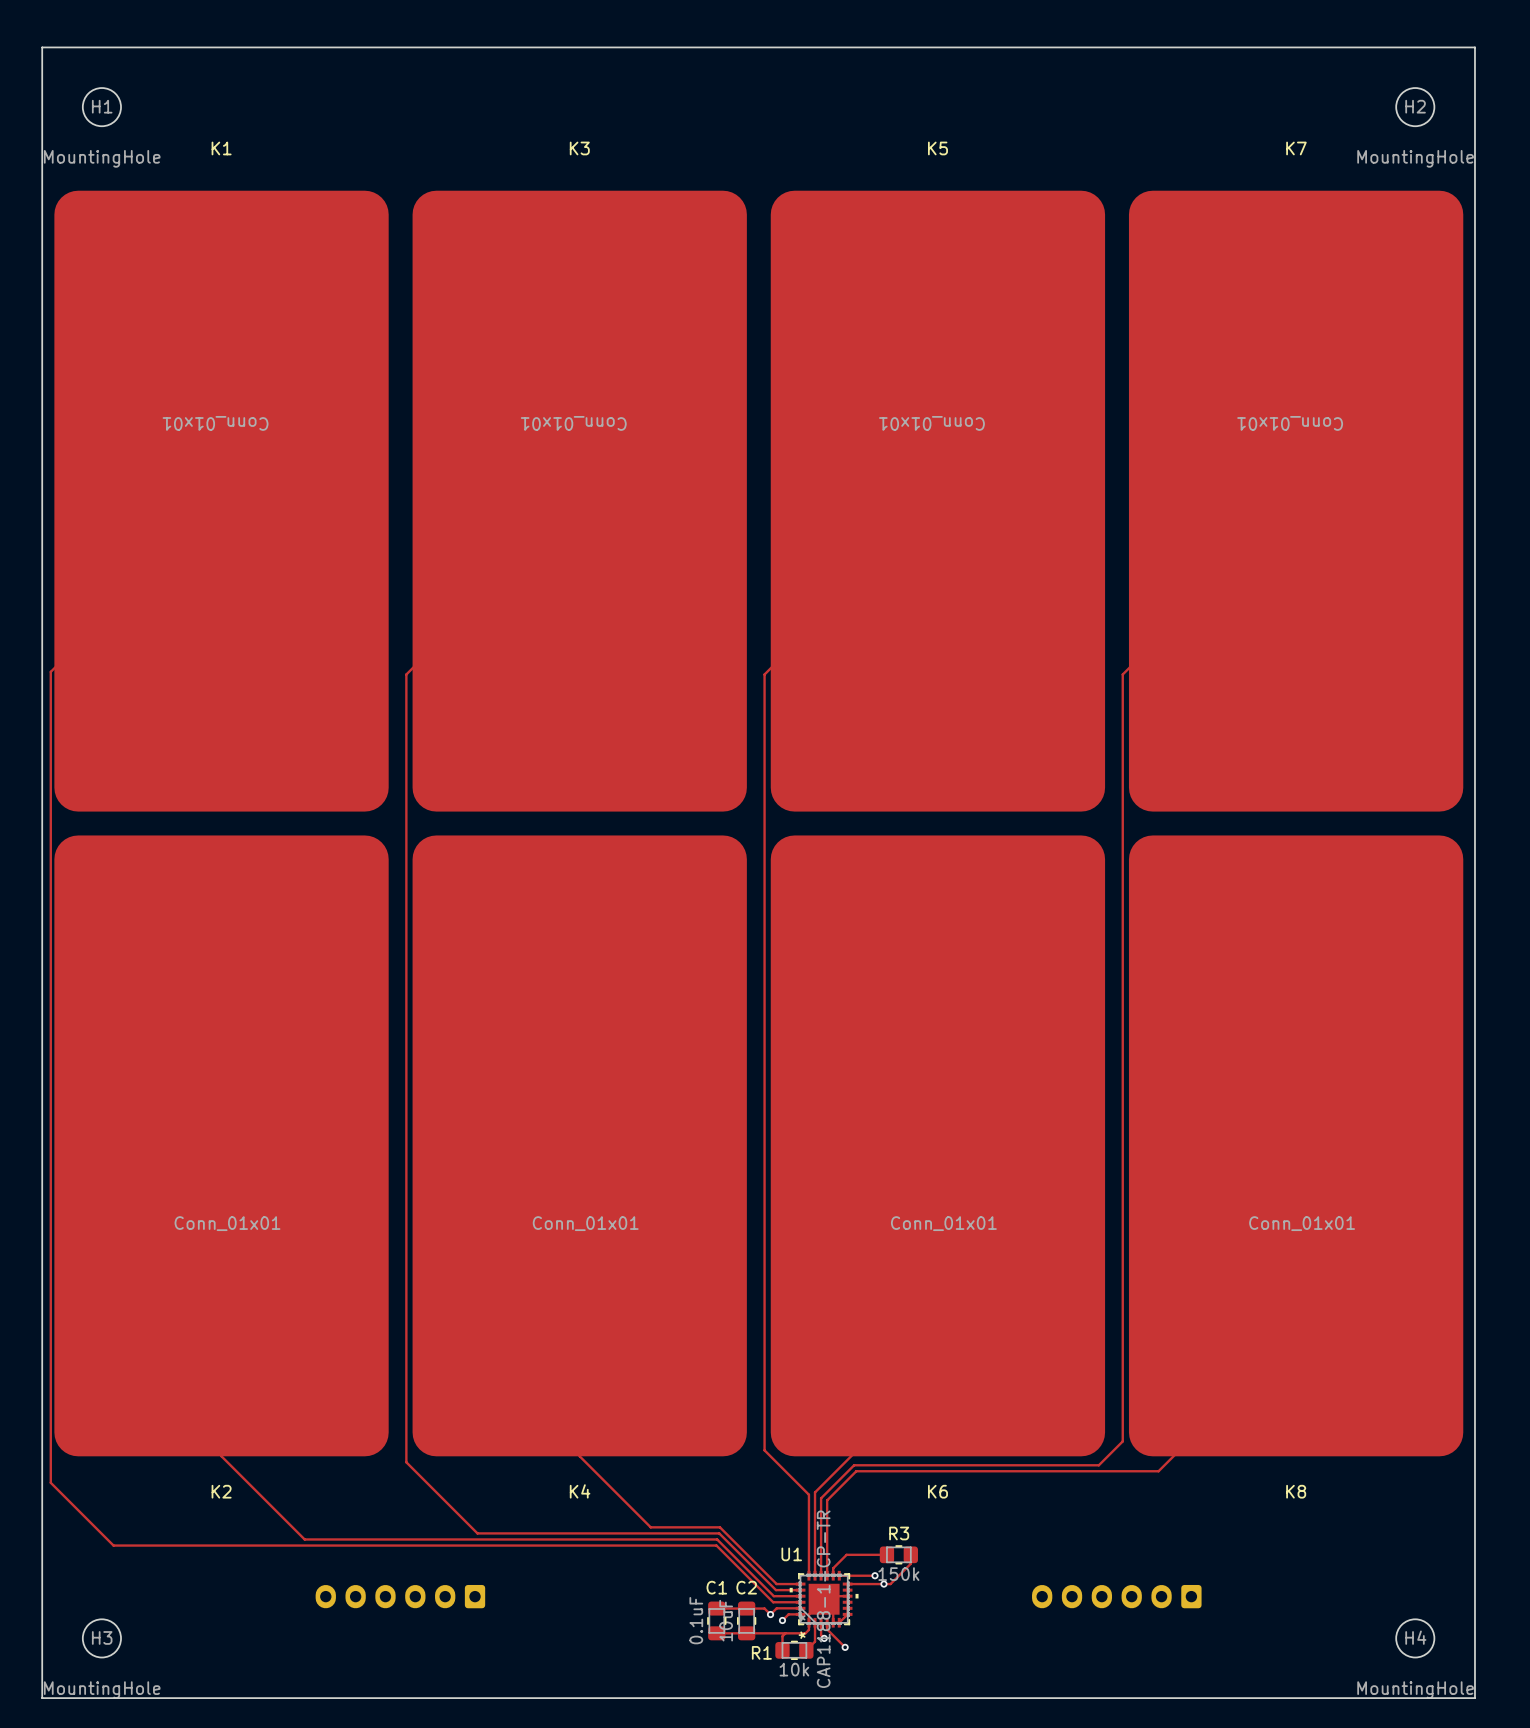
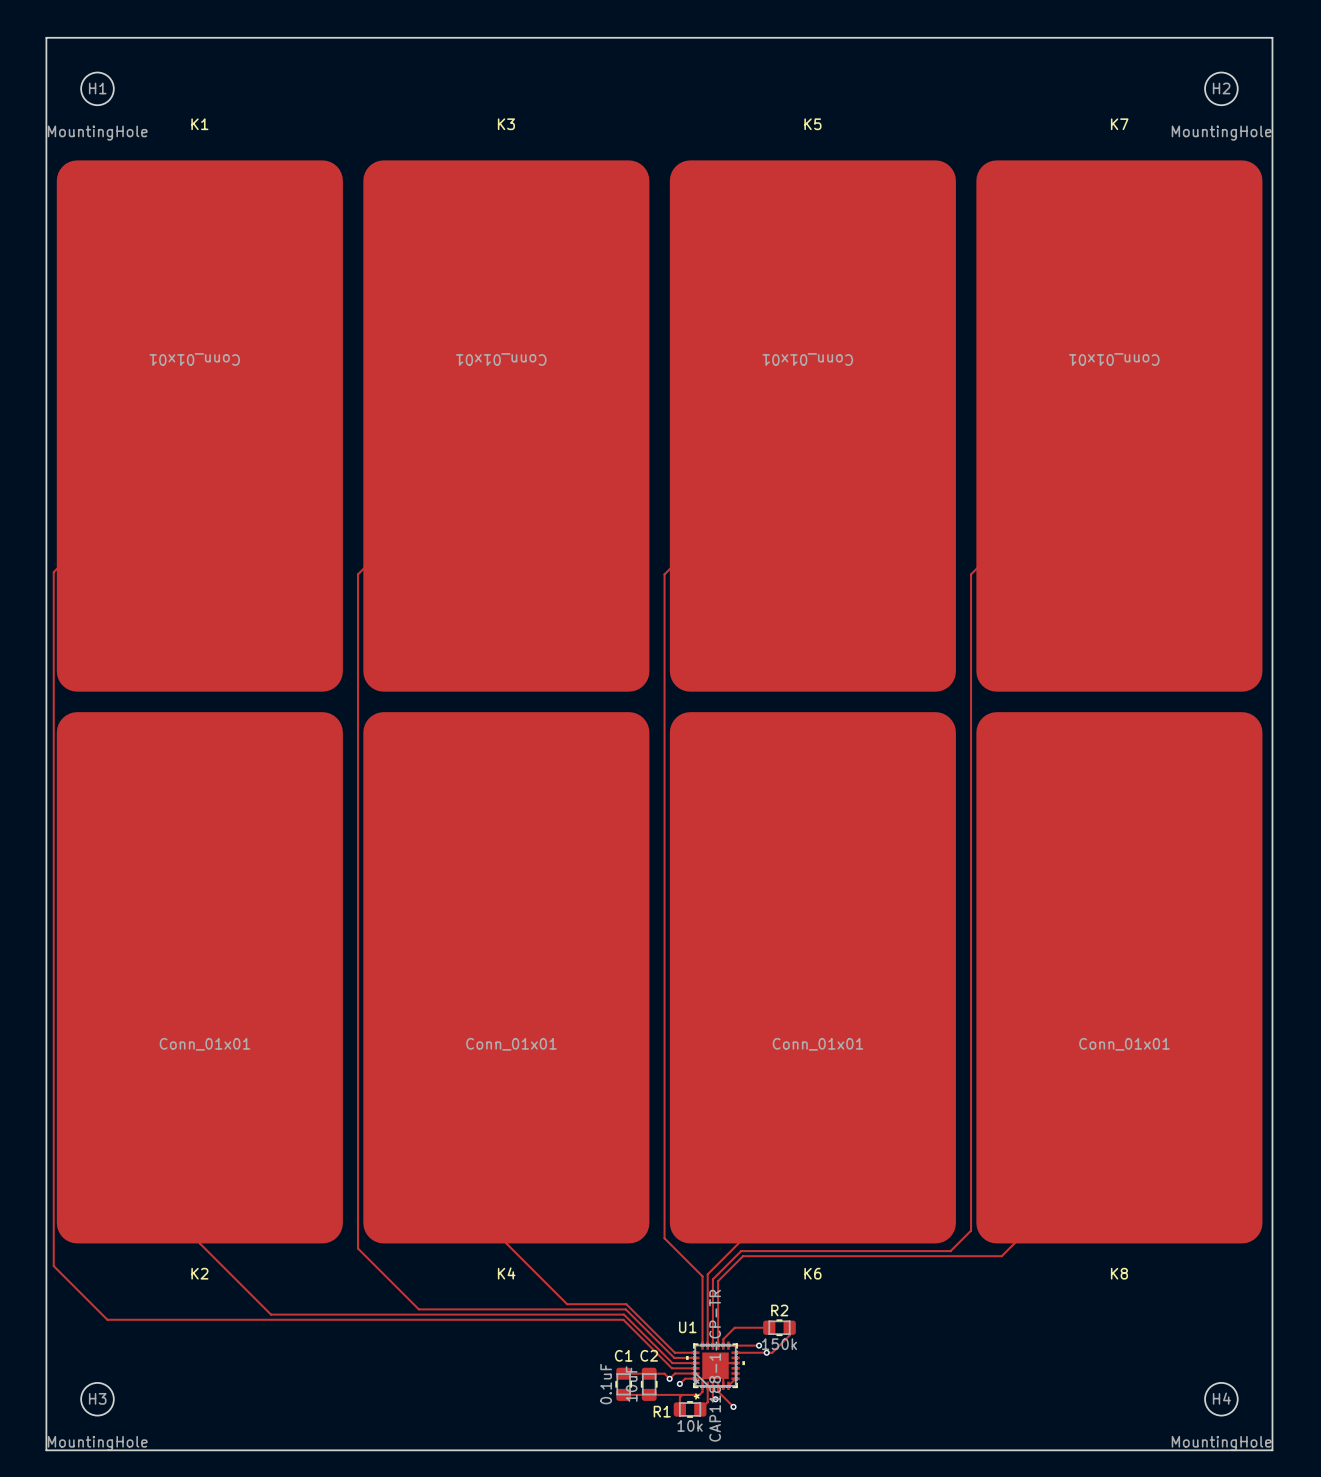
R3 name: R3 (899, 1533) -> R2 (779, 1310)
part: (400, 1596) -> none
part: (1116, 1596) -> none

